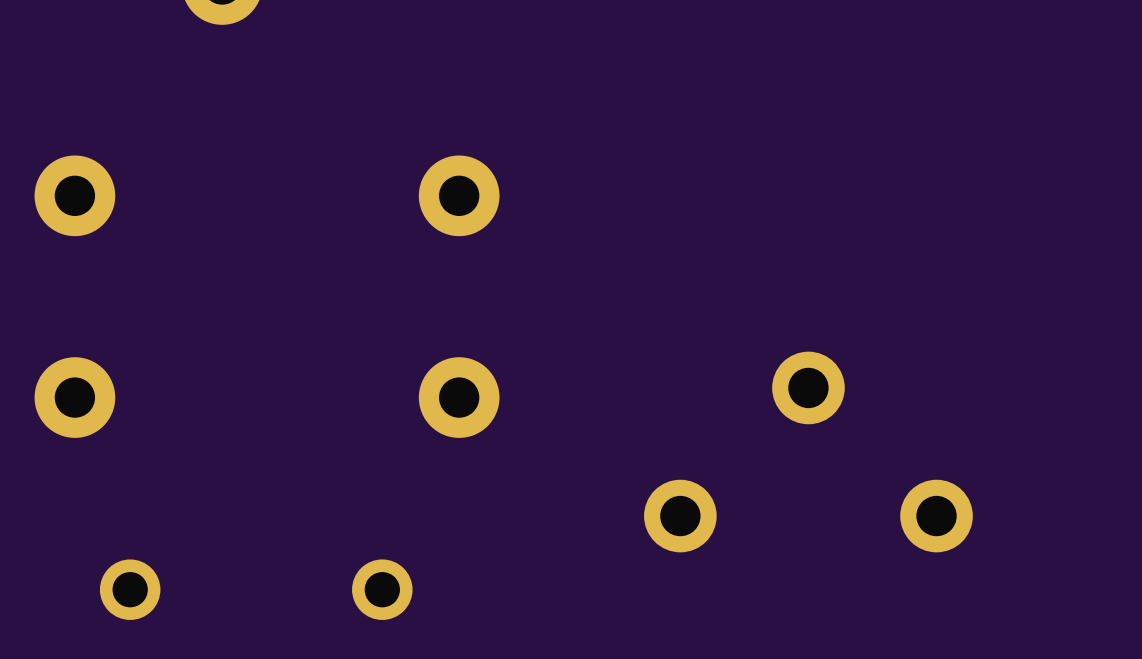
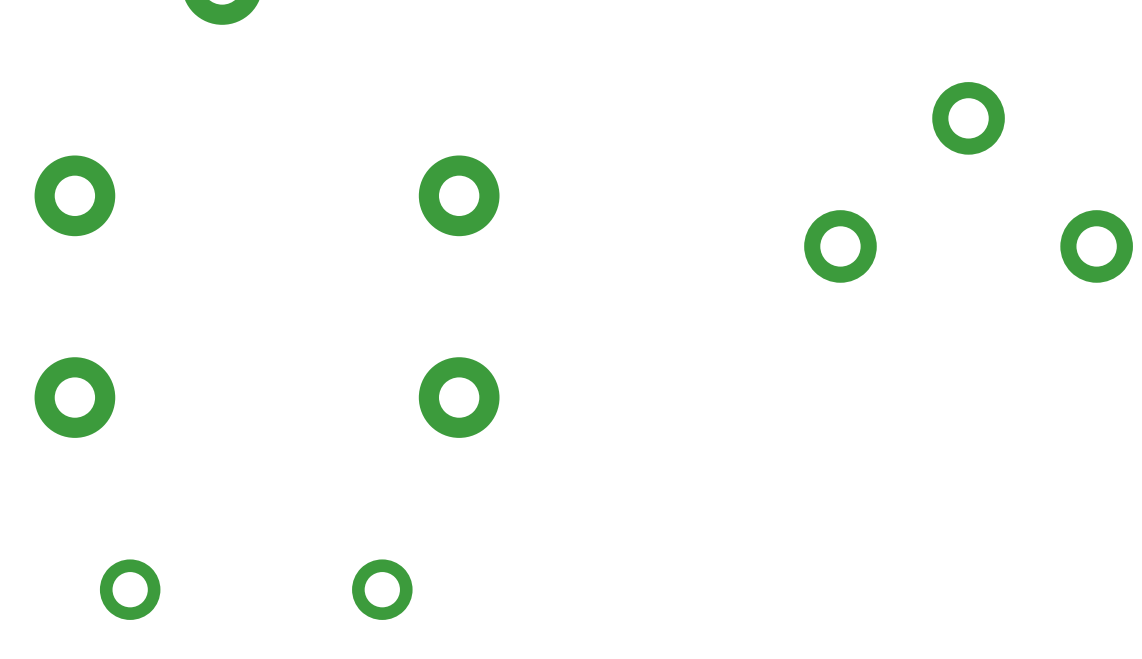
part position: (808, 452) -> (968, 182)

